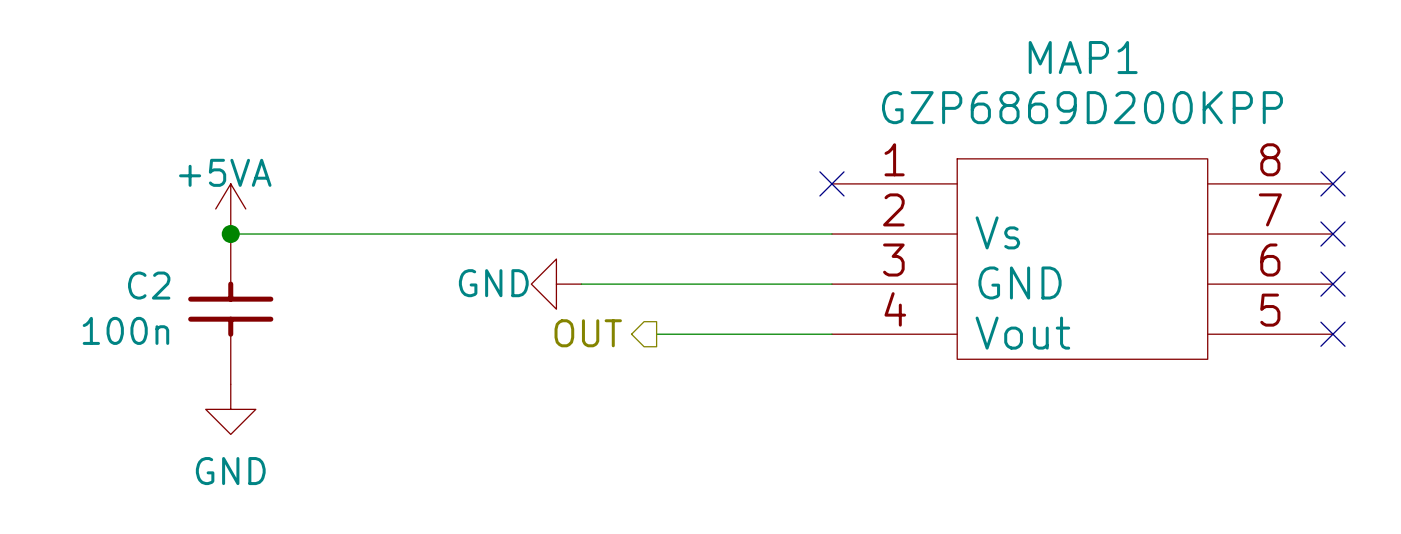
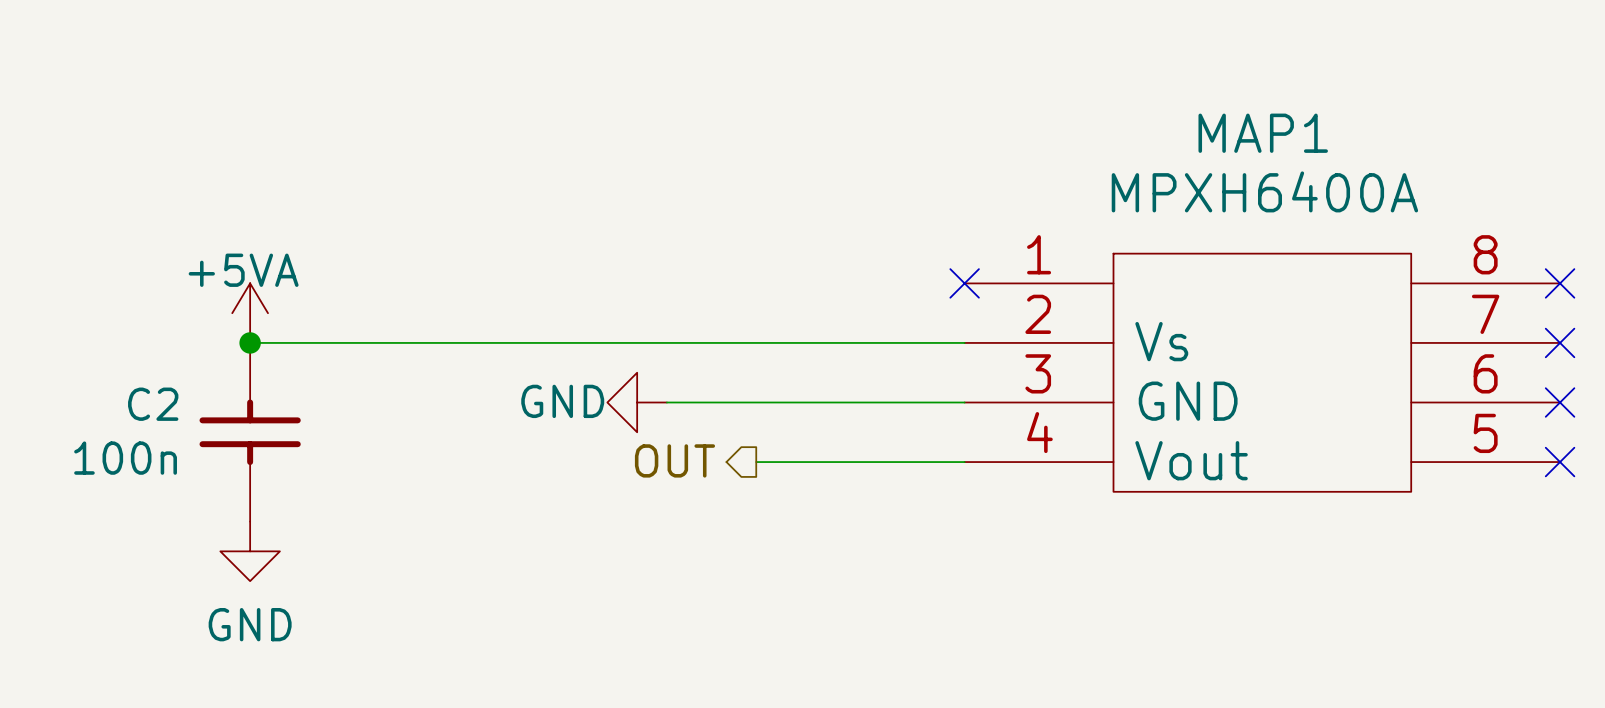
MAP1 value: GZP6869D200KPP (1082, 107) -> MPXH6400A (1264, 191)

